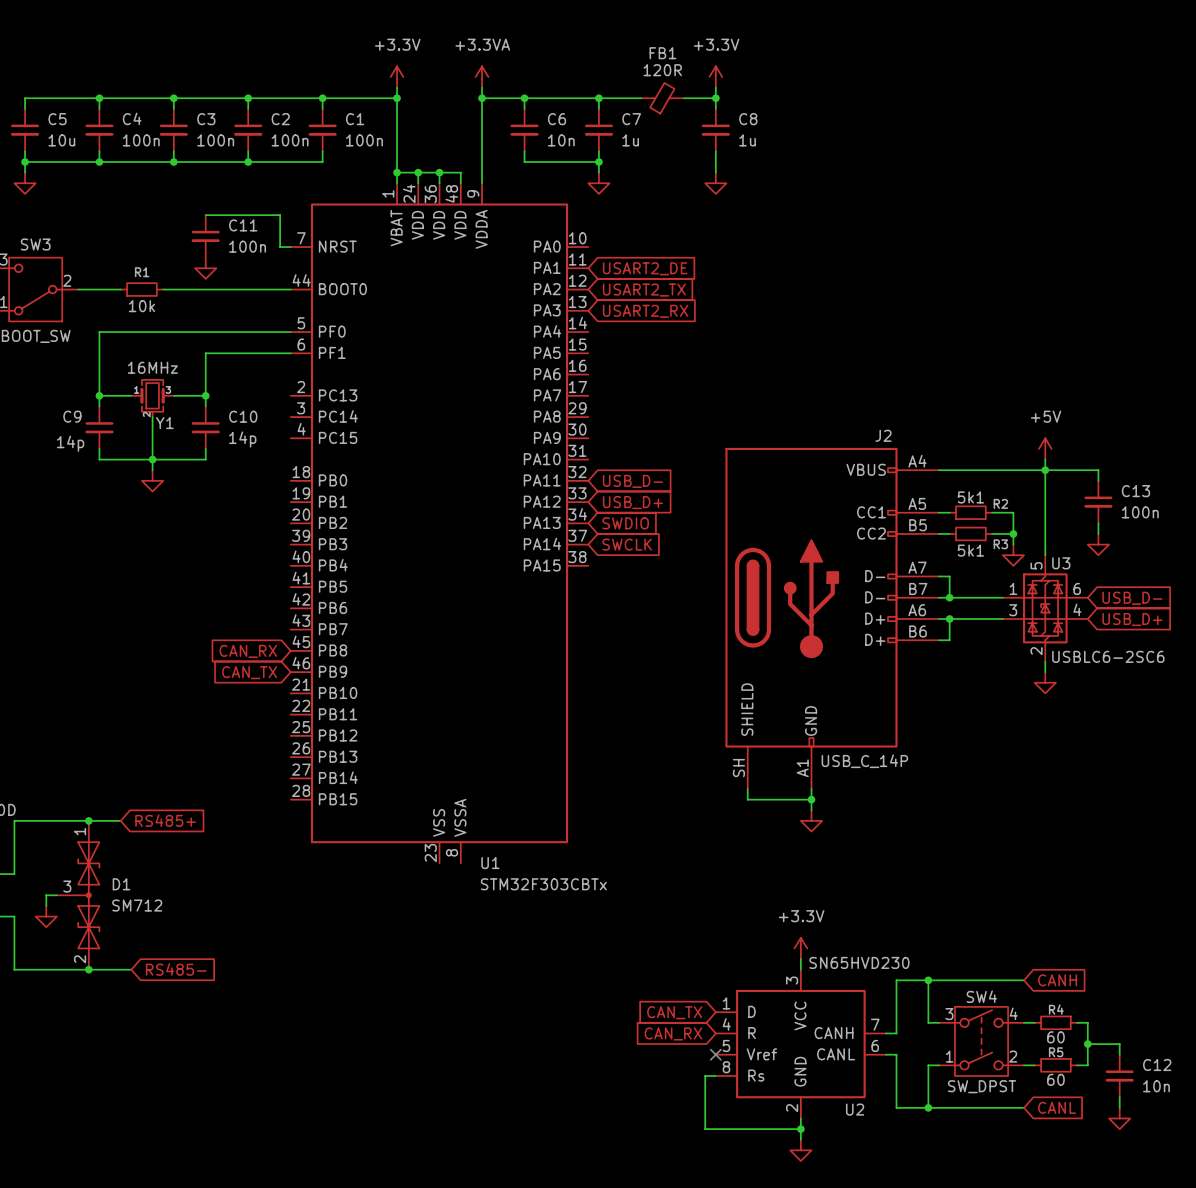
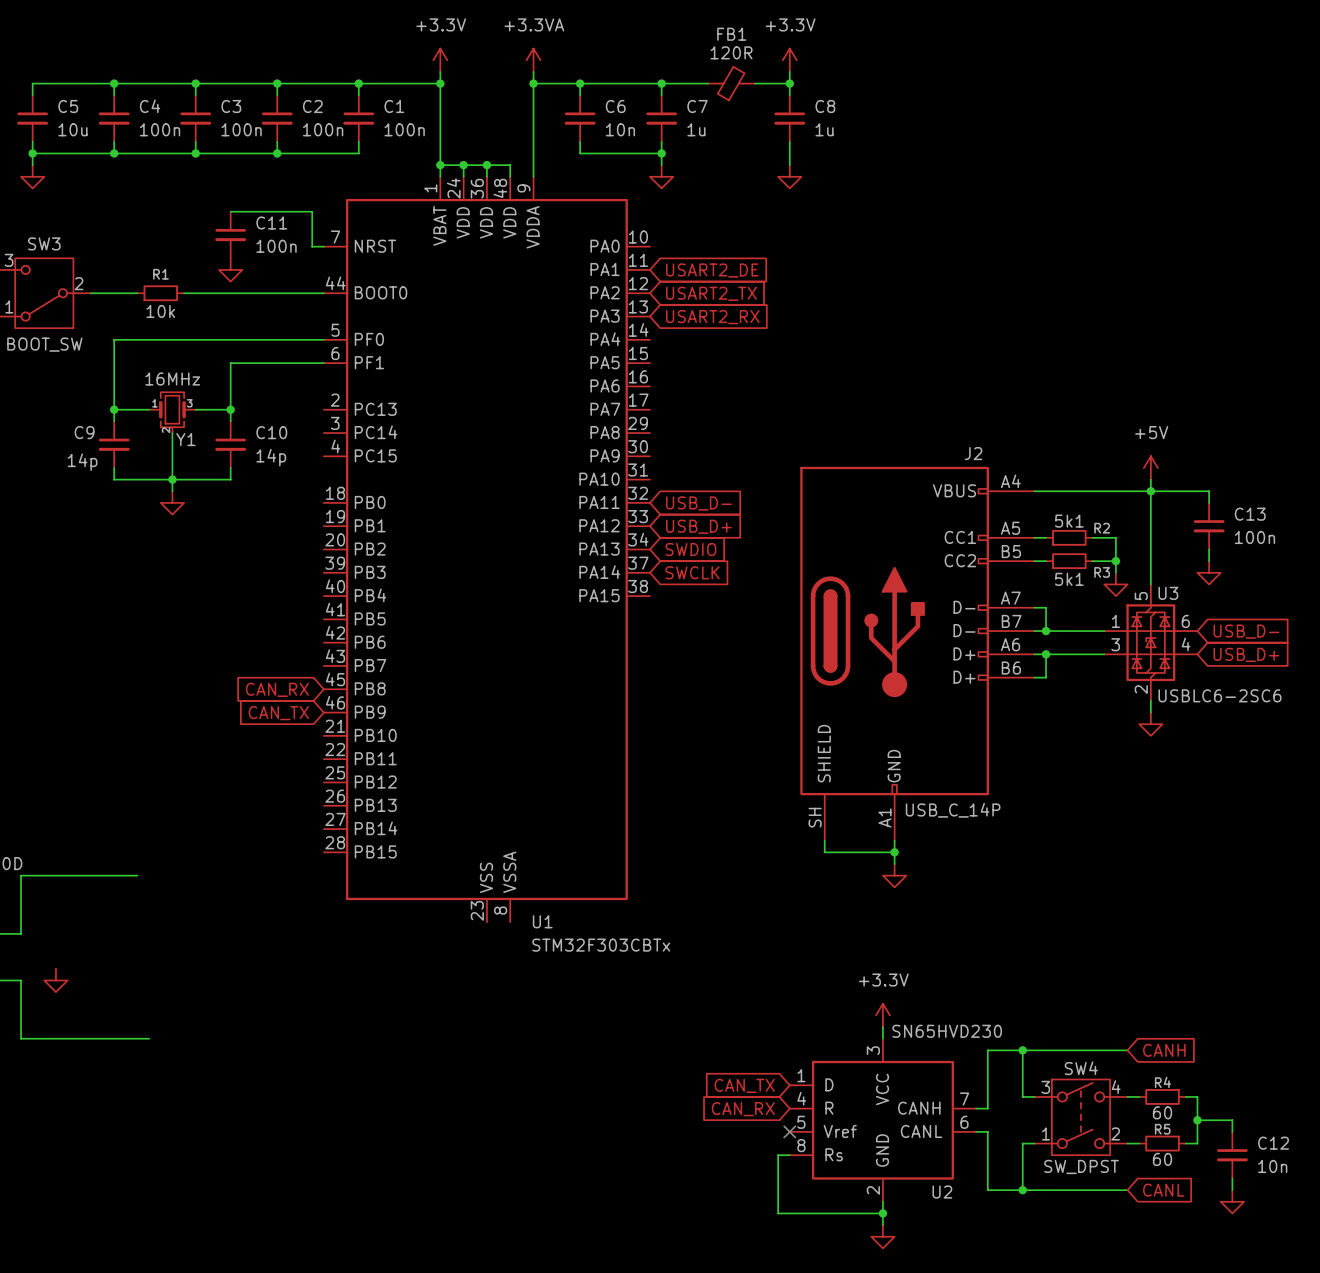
junction: (88, 820) -> none
global label: RS485+ (165, 820) -> none
wire: (56, 895) (46, 895) (46, 905) -> none
D1: SM712 (78, 895) -> none
junction: (88, 969) -> none
global label: RS485- (176, 969) -> none

